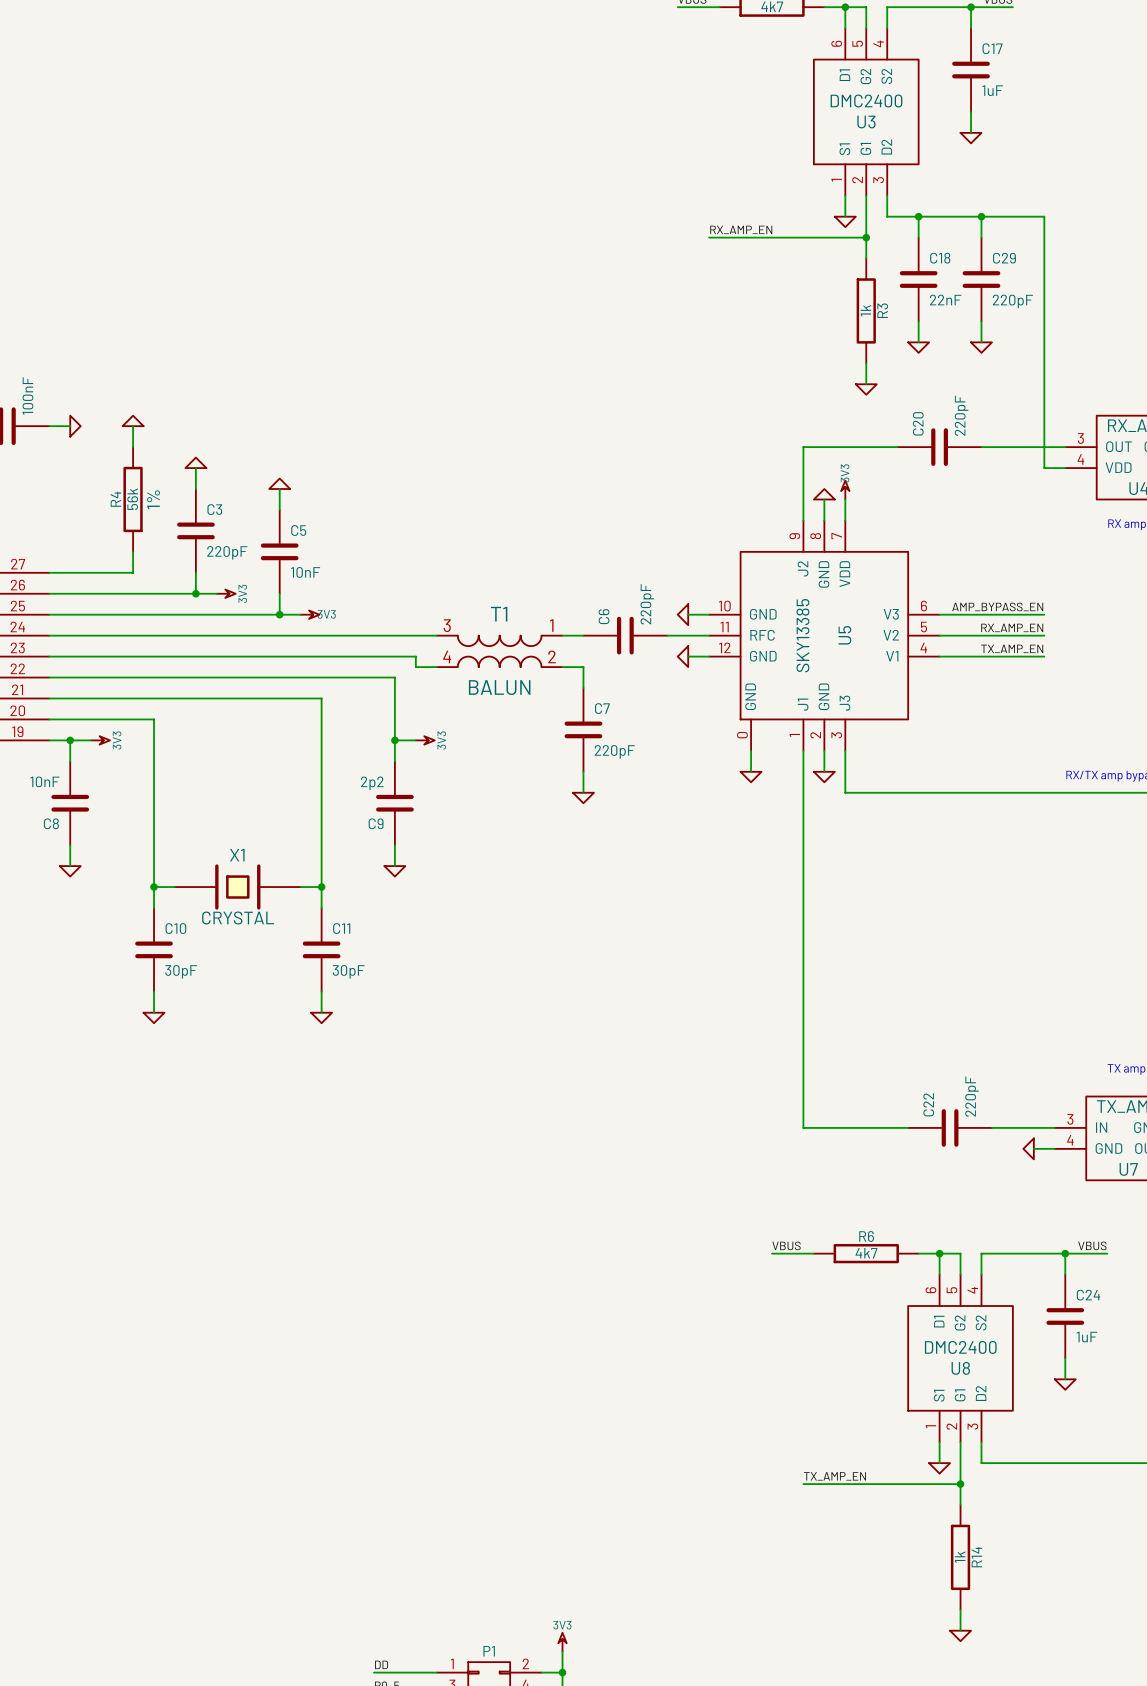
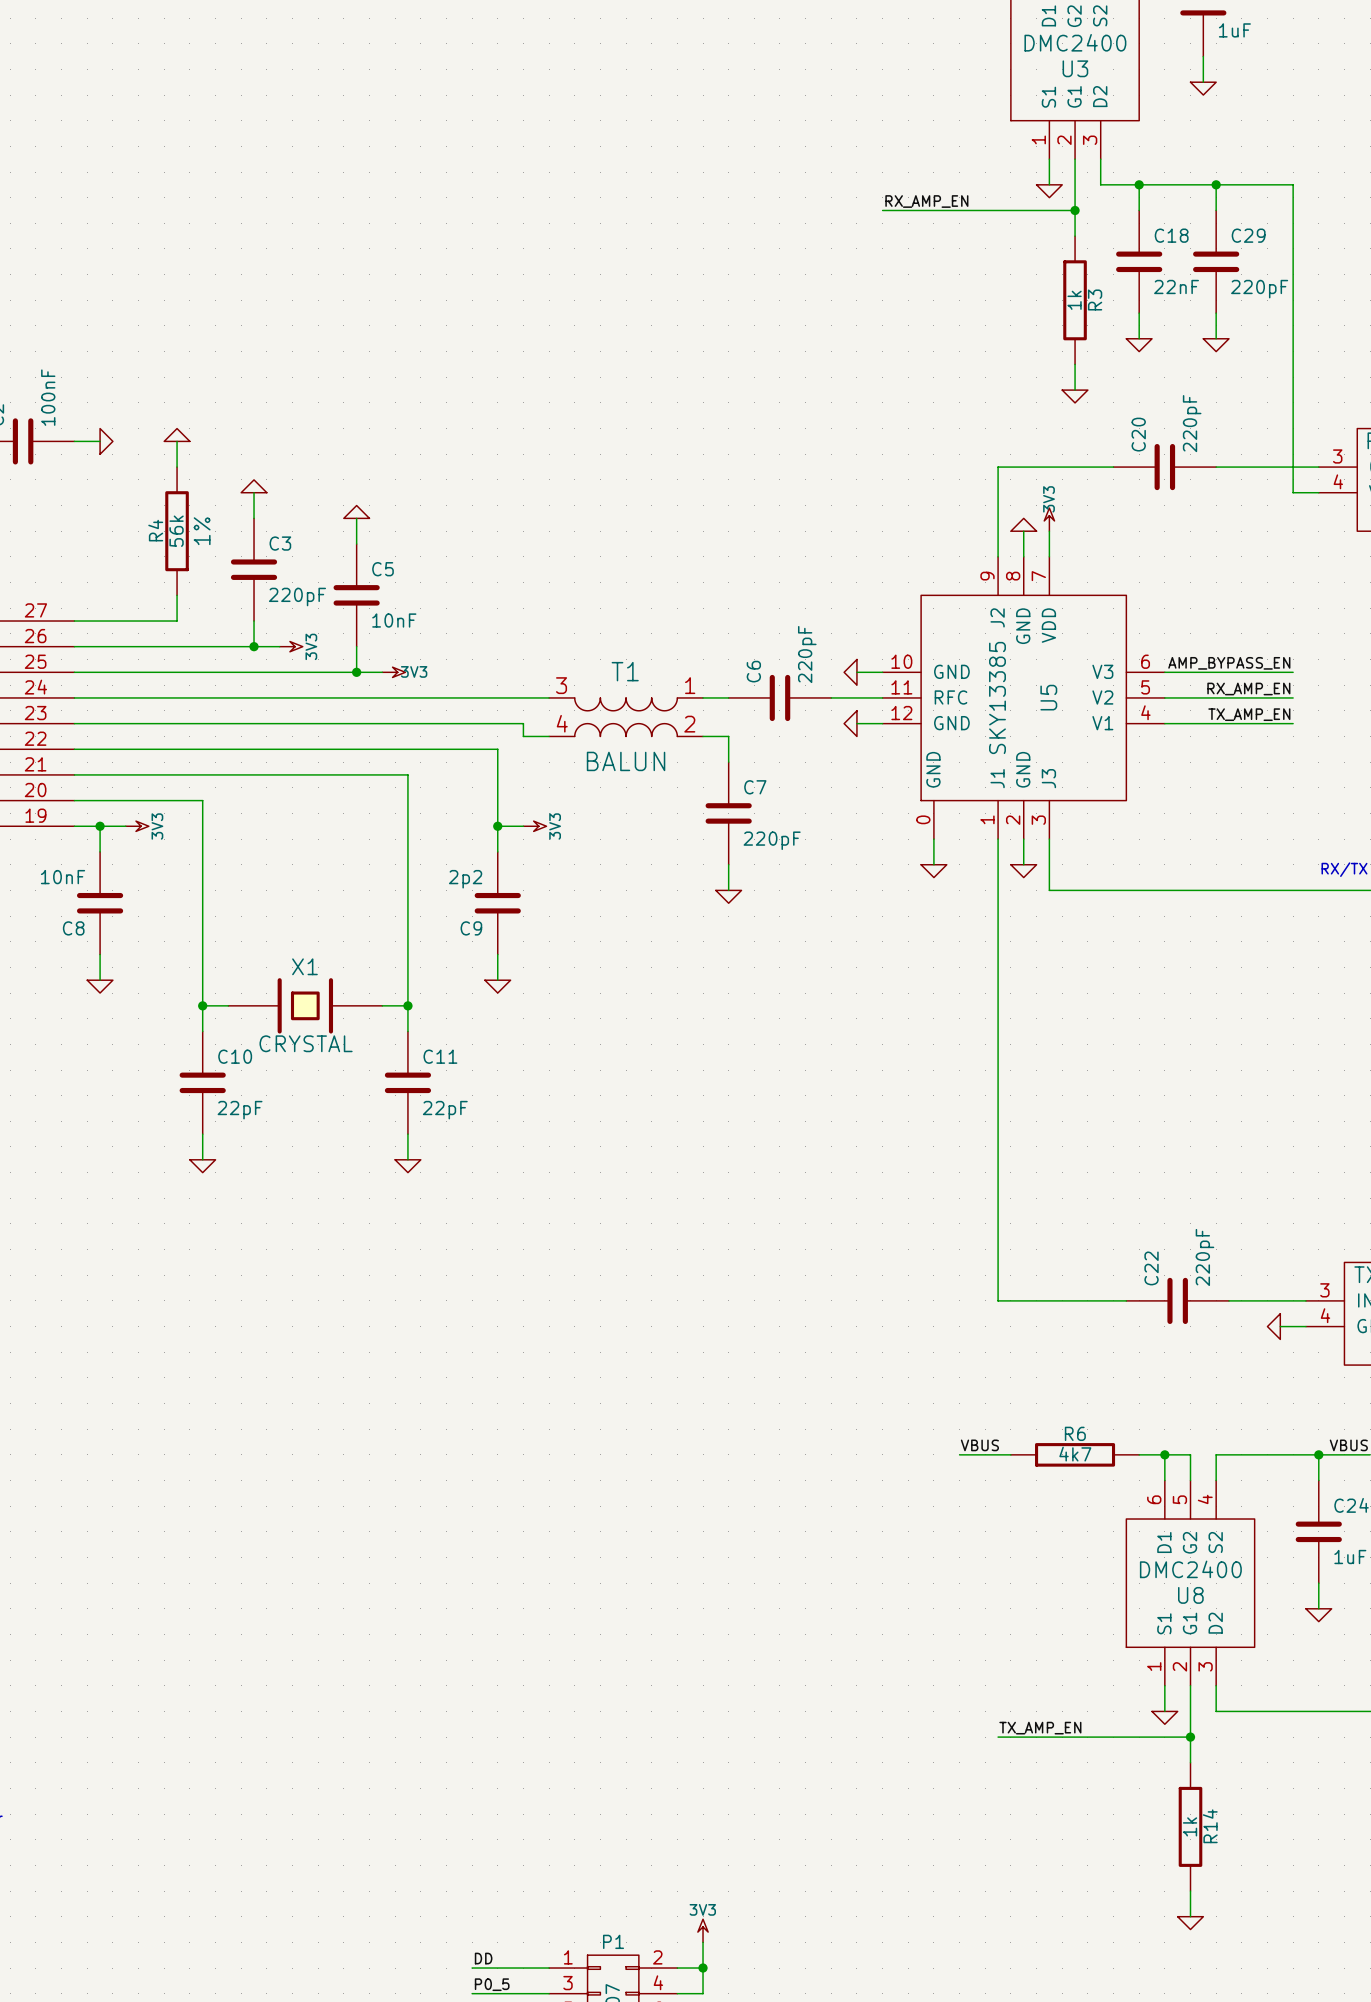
C10 value: 30pF (181, 971) -> 22pF (240, 1110)
C11 value: 30pF (348, 971) -> 22pF (445, 1110)

